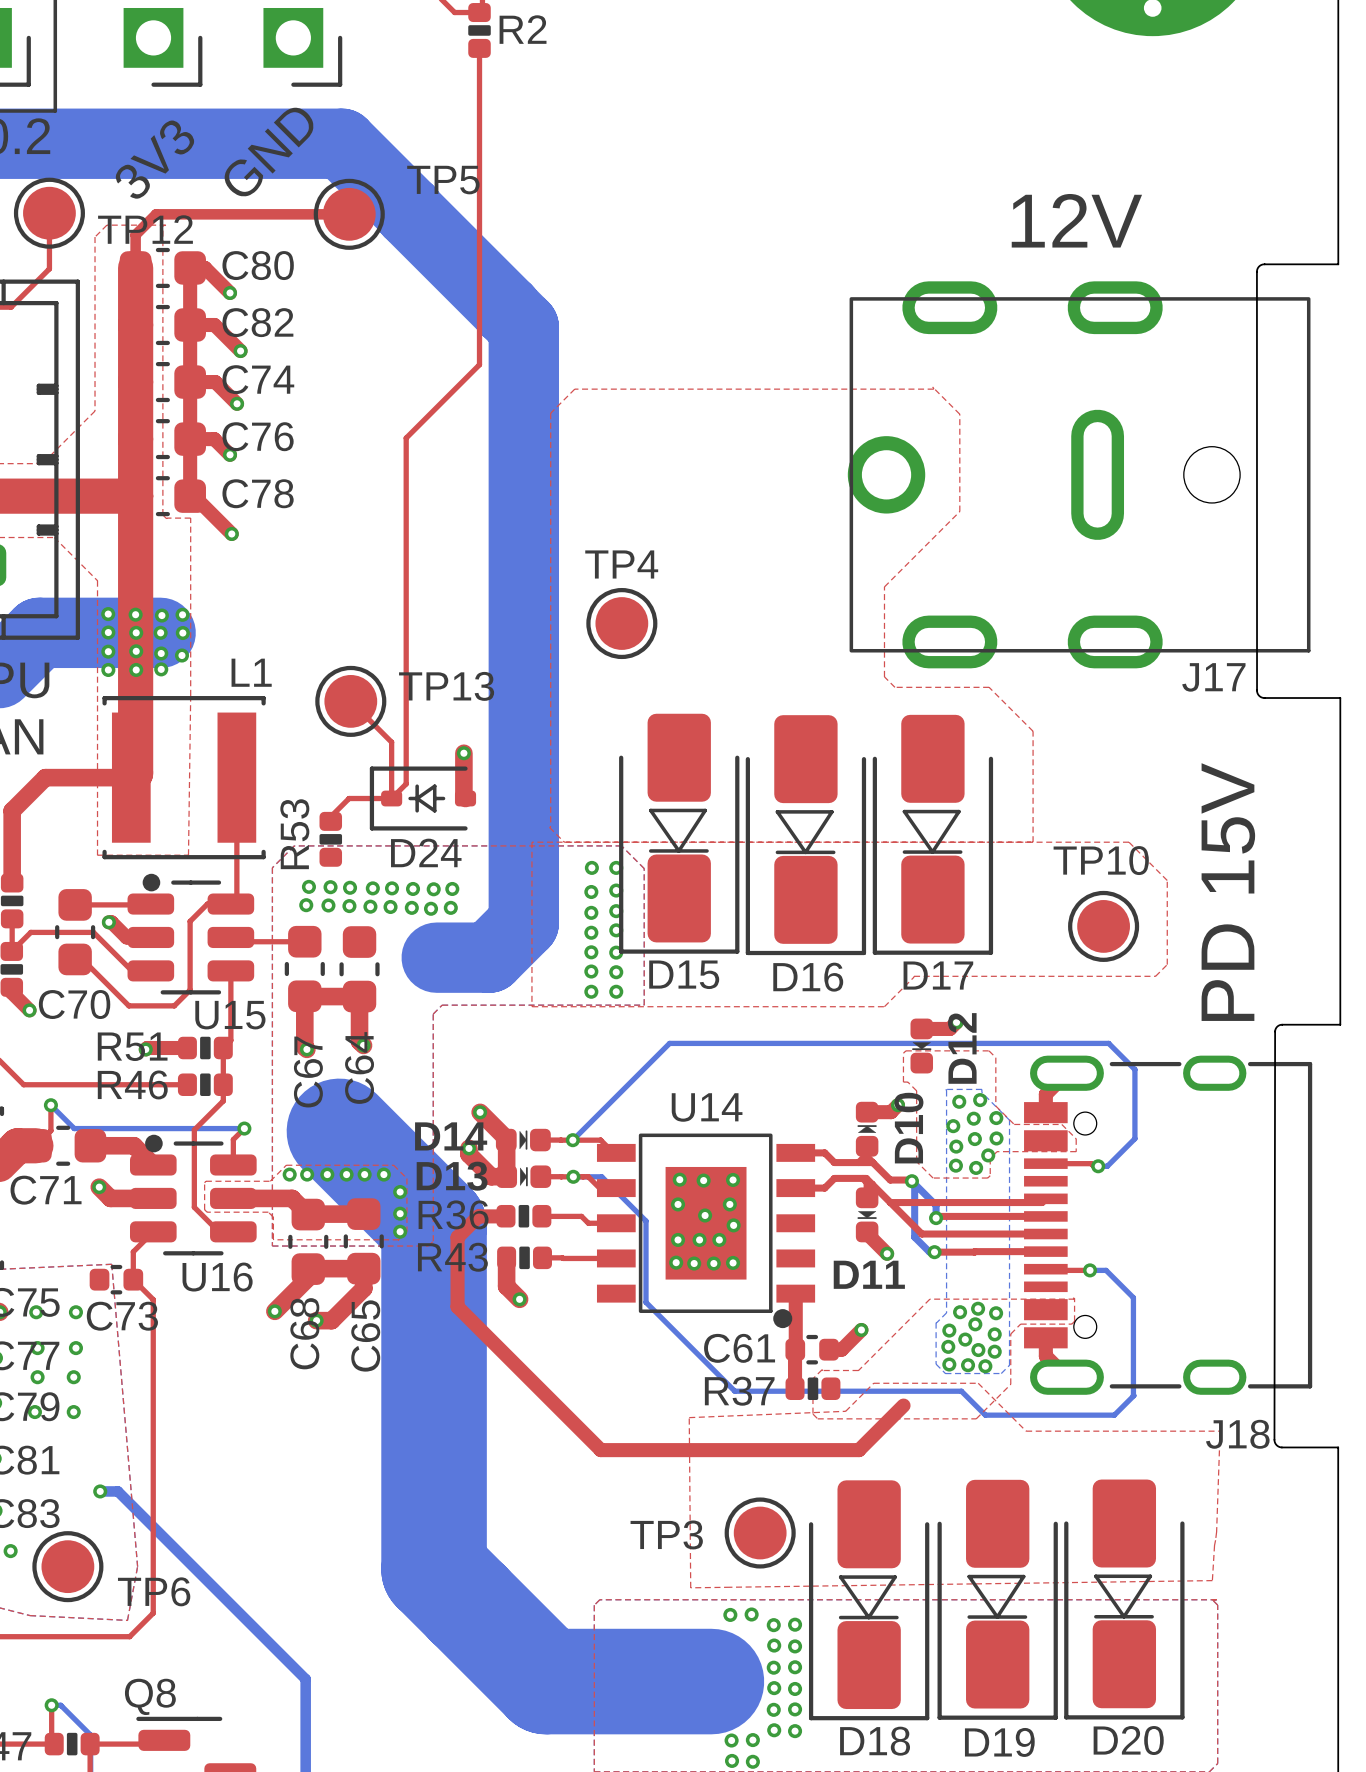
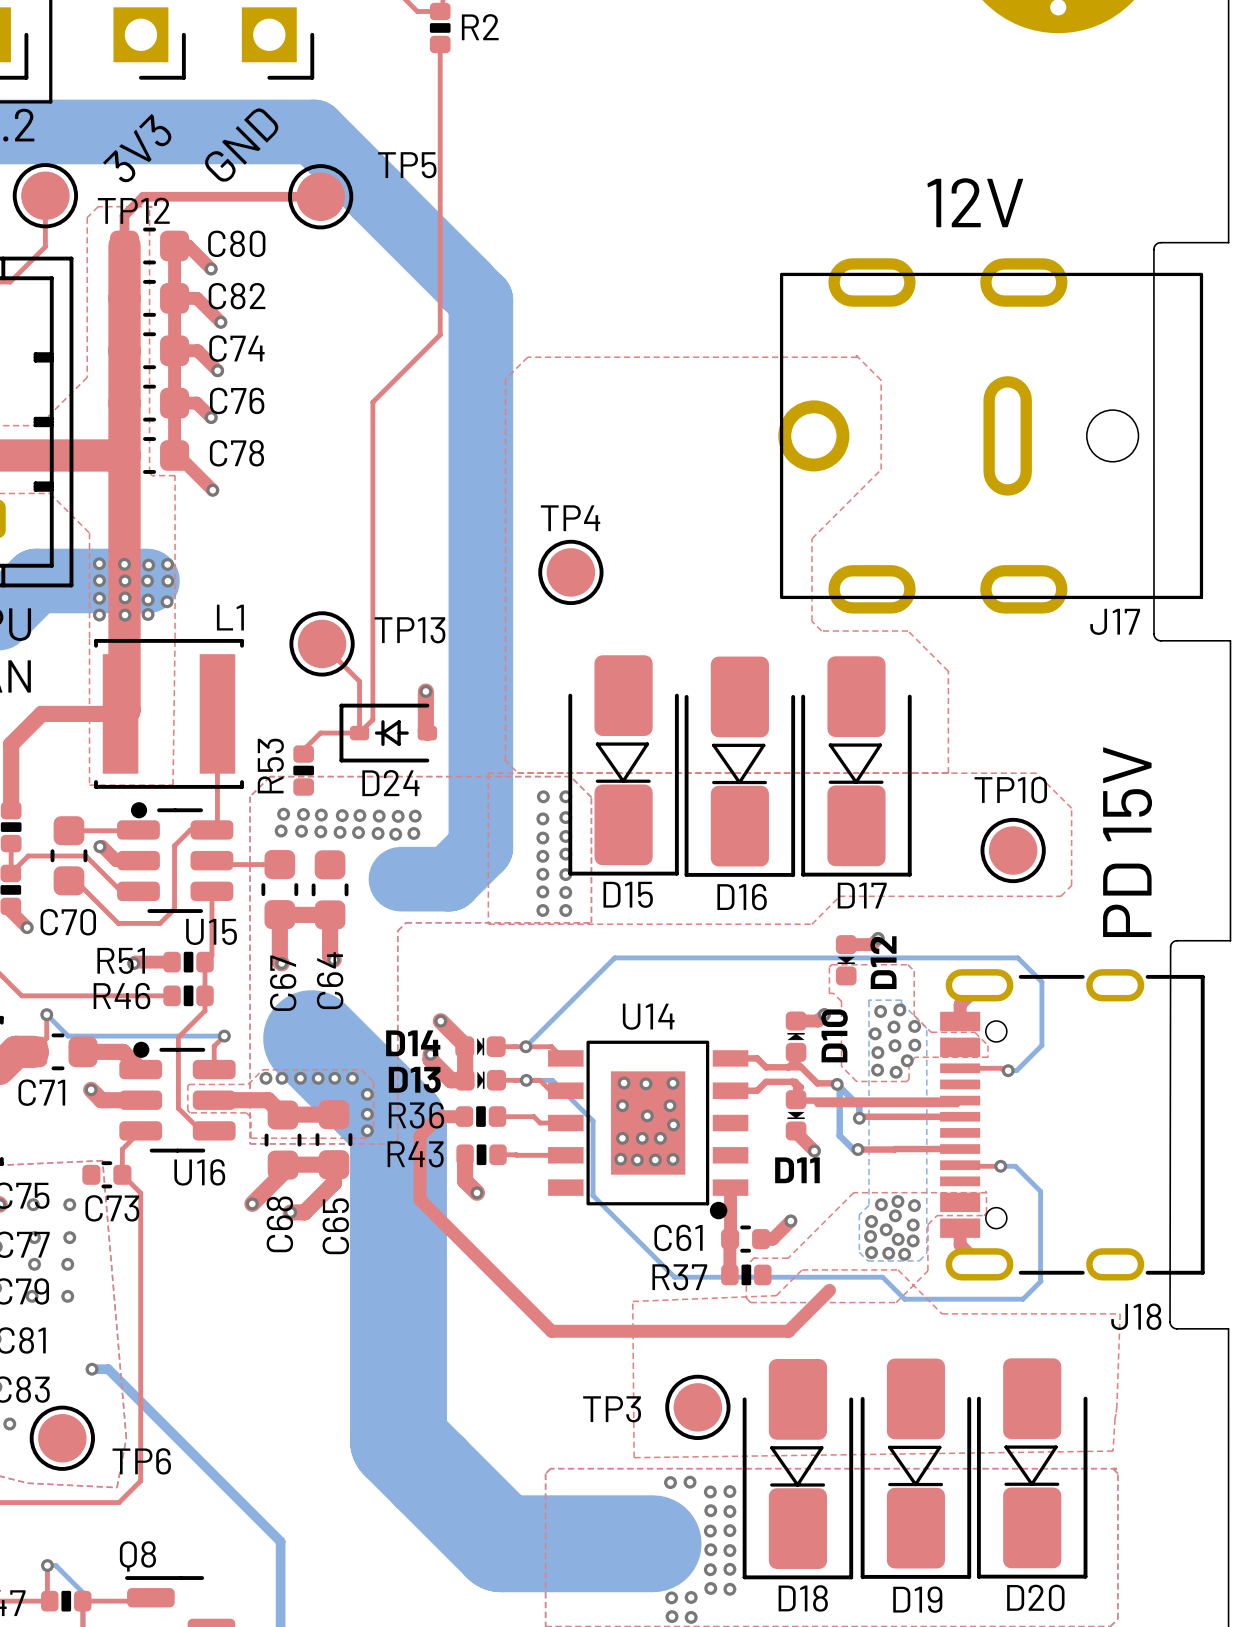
top track: (872, 1184) (921, 1234) (1045, 1234) -> none
top track: none -> (796, 1099) (960, 1100)

